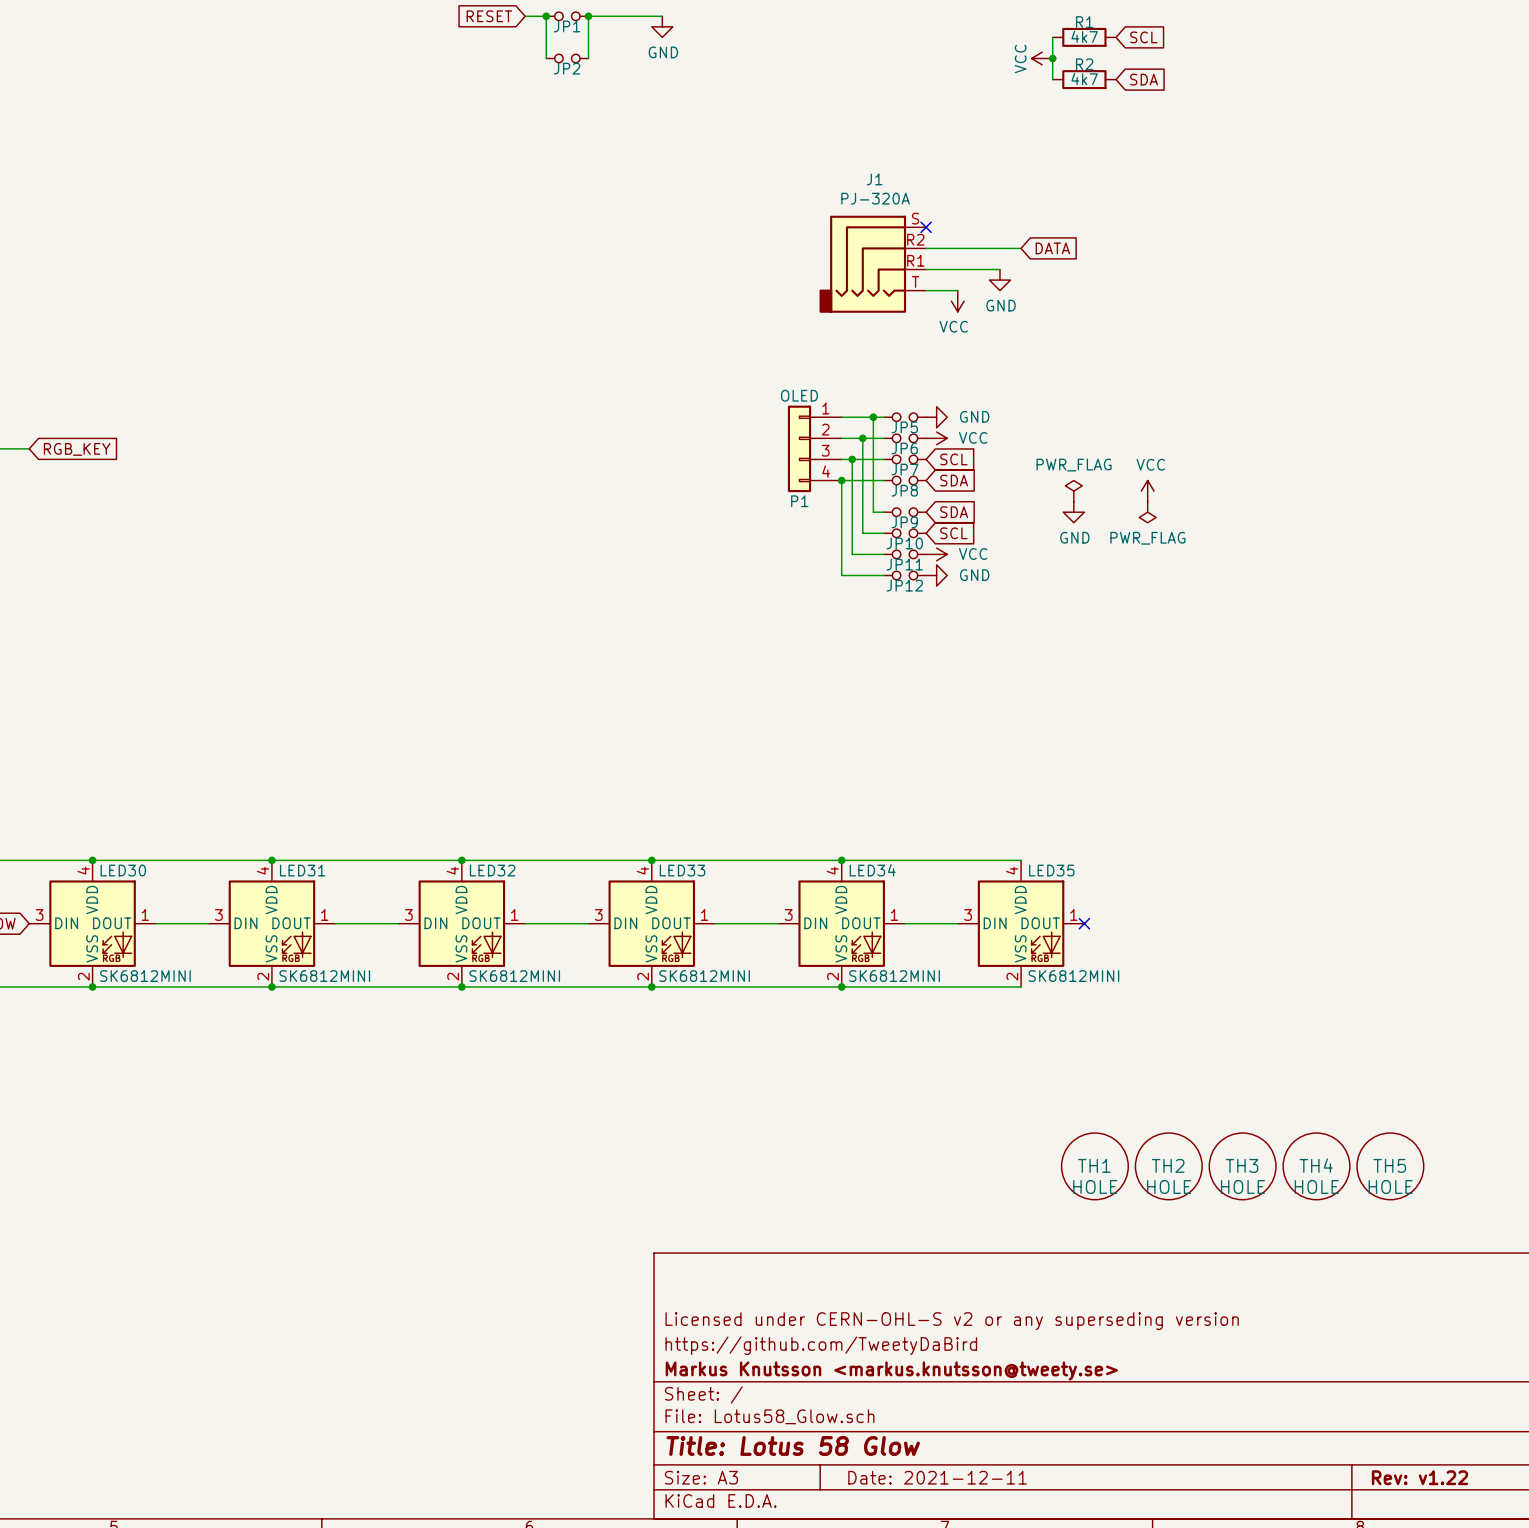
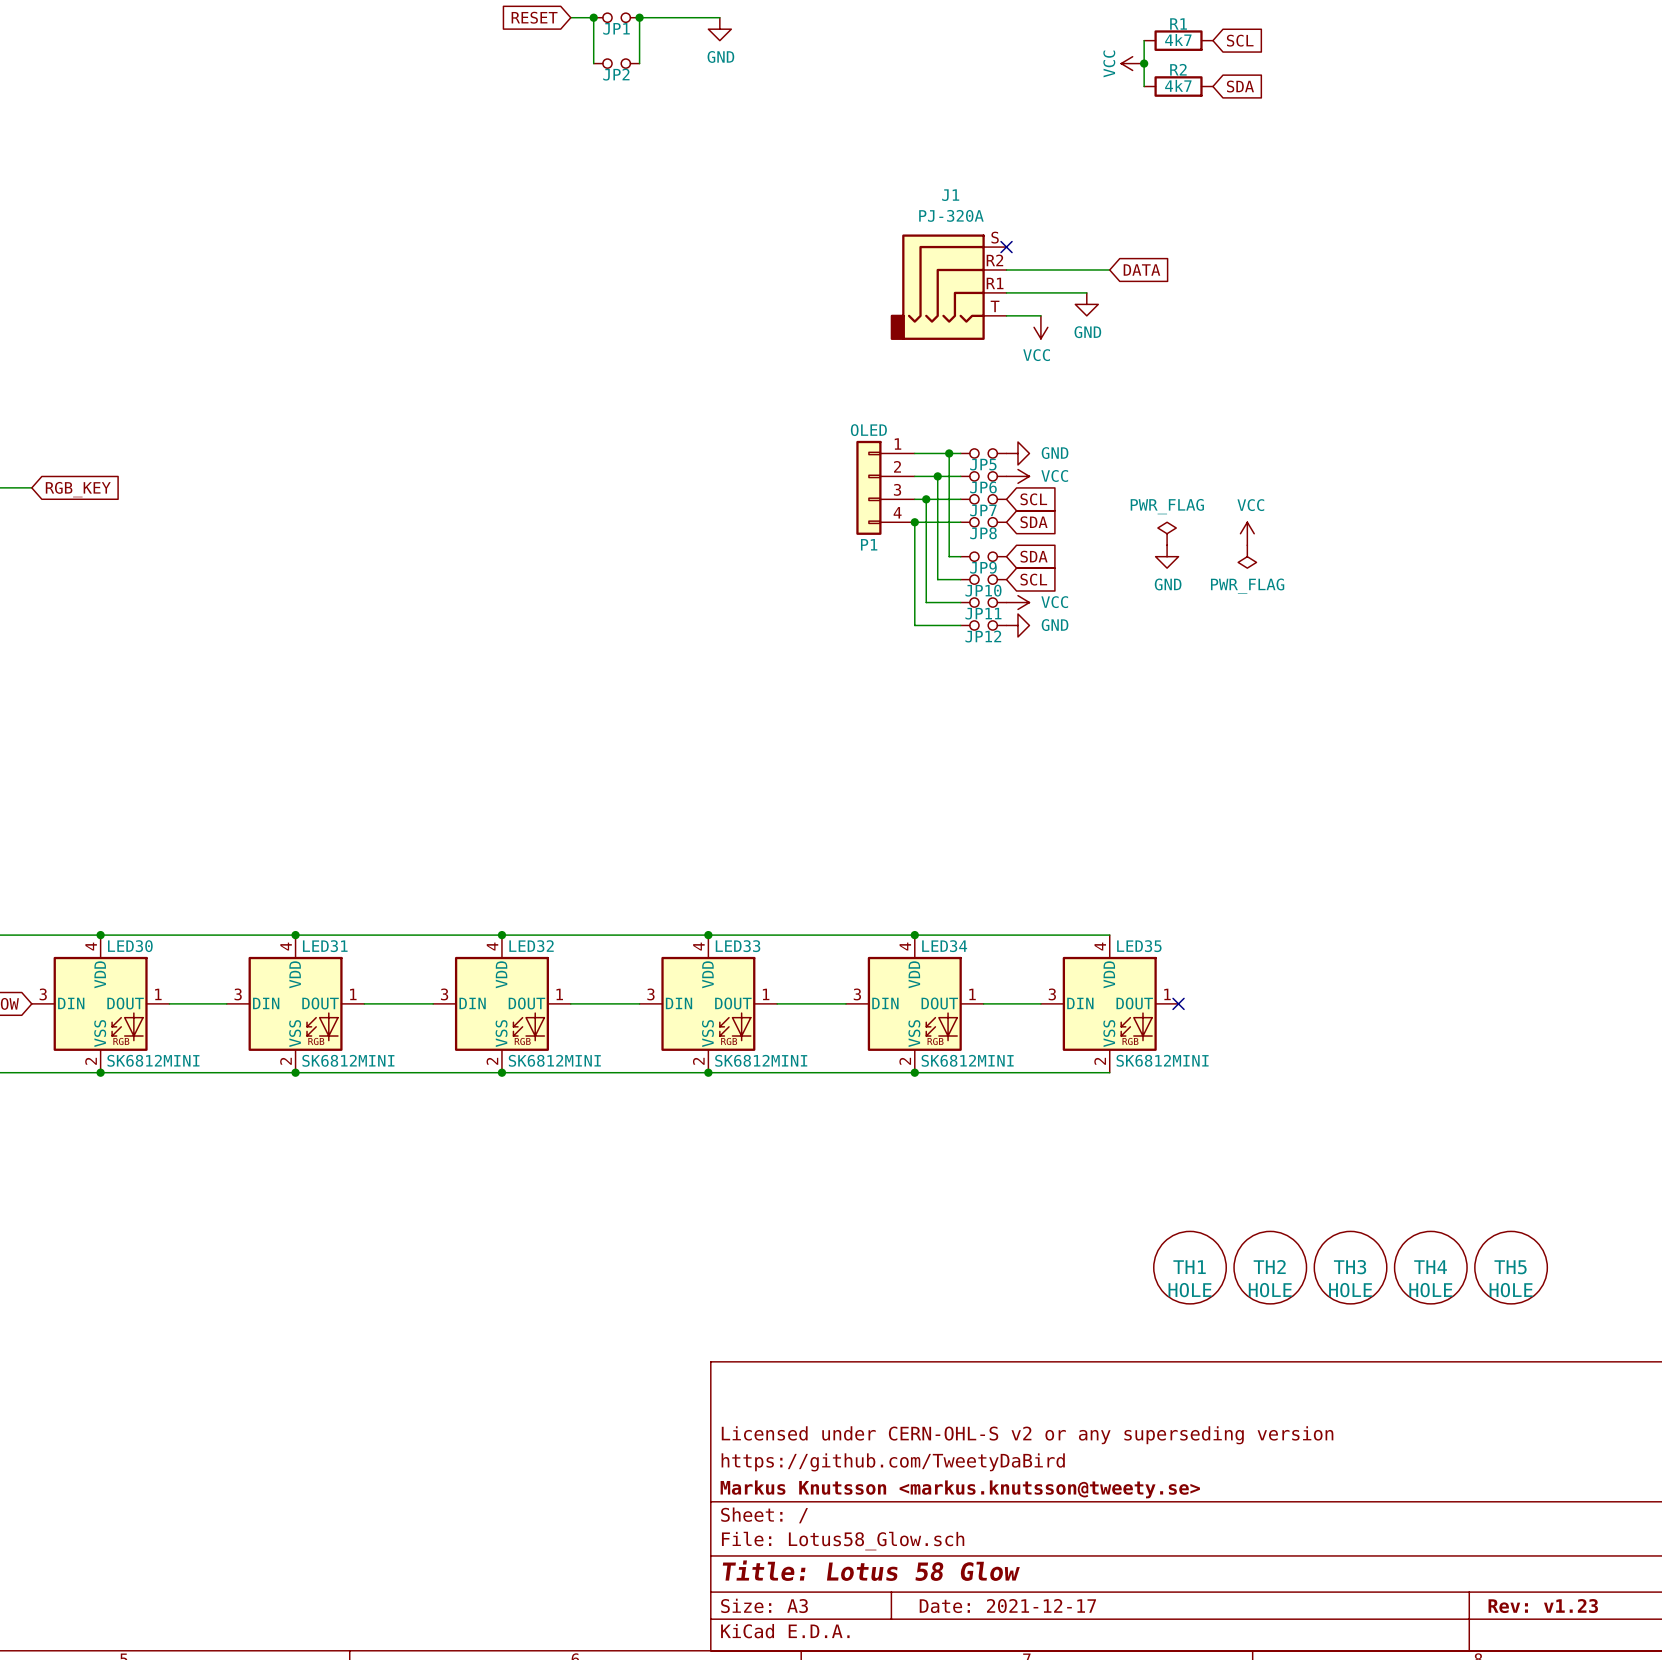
title block: Date: 2021-12-11 (937, 1477) -> Date: 2021-12-17 (1007, 1606)
title block: Rev: v1.22 (1419, 1477) -> Rev: v1.23 (1543, 1606)

